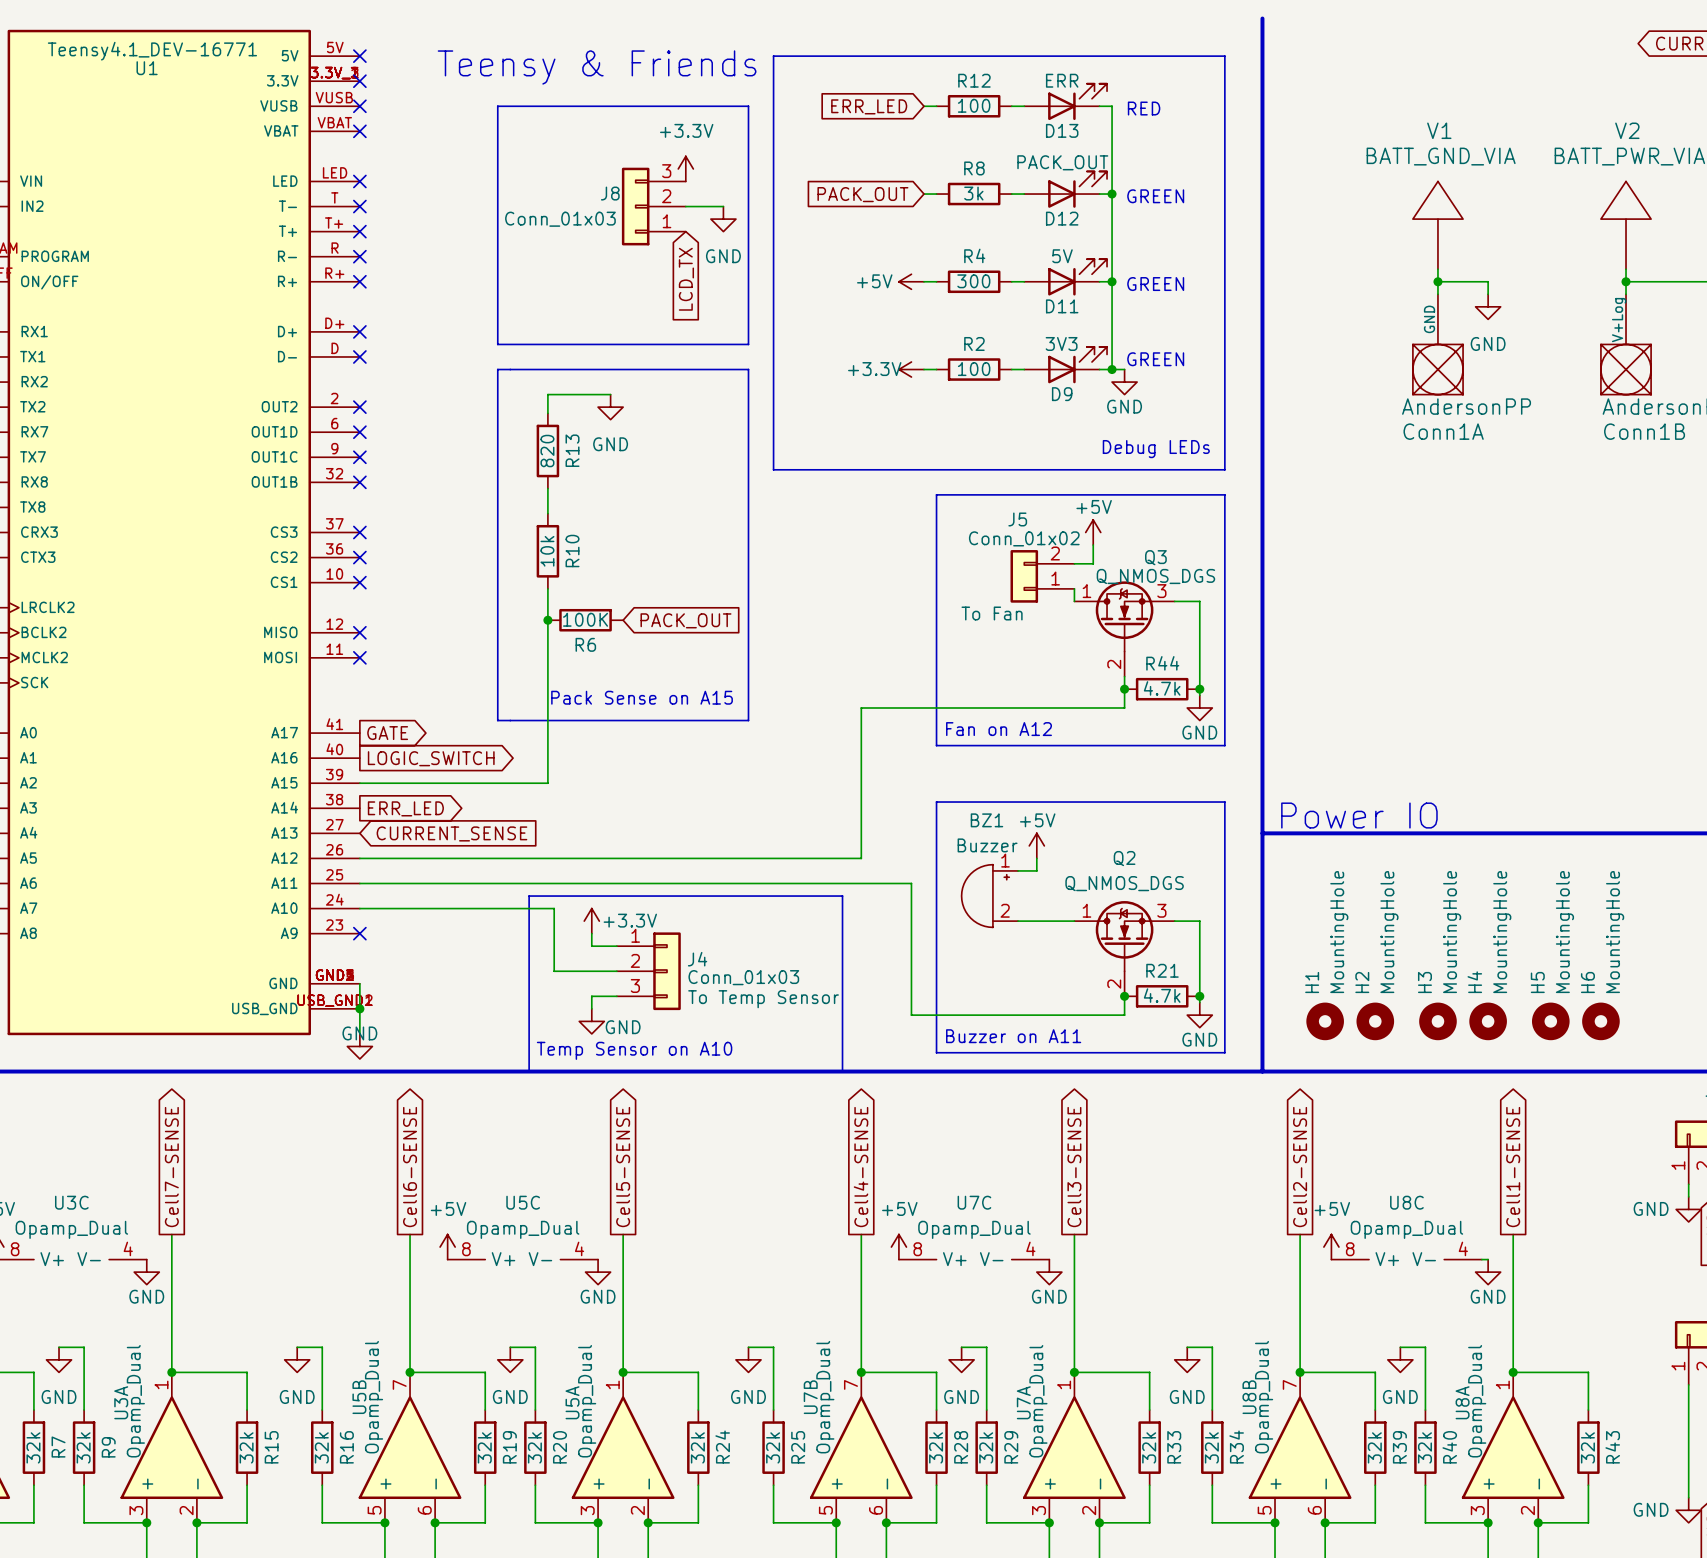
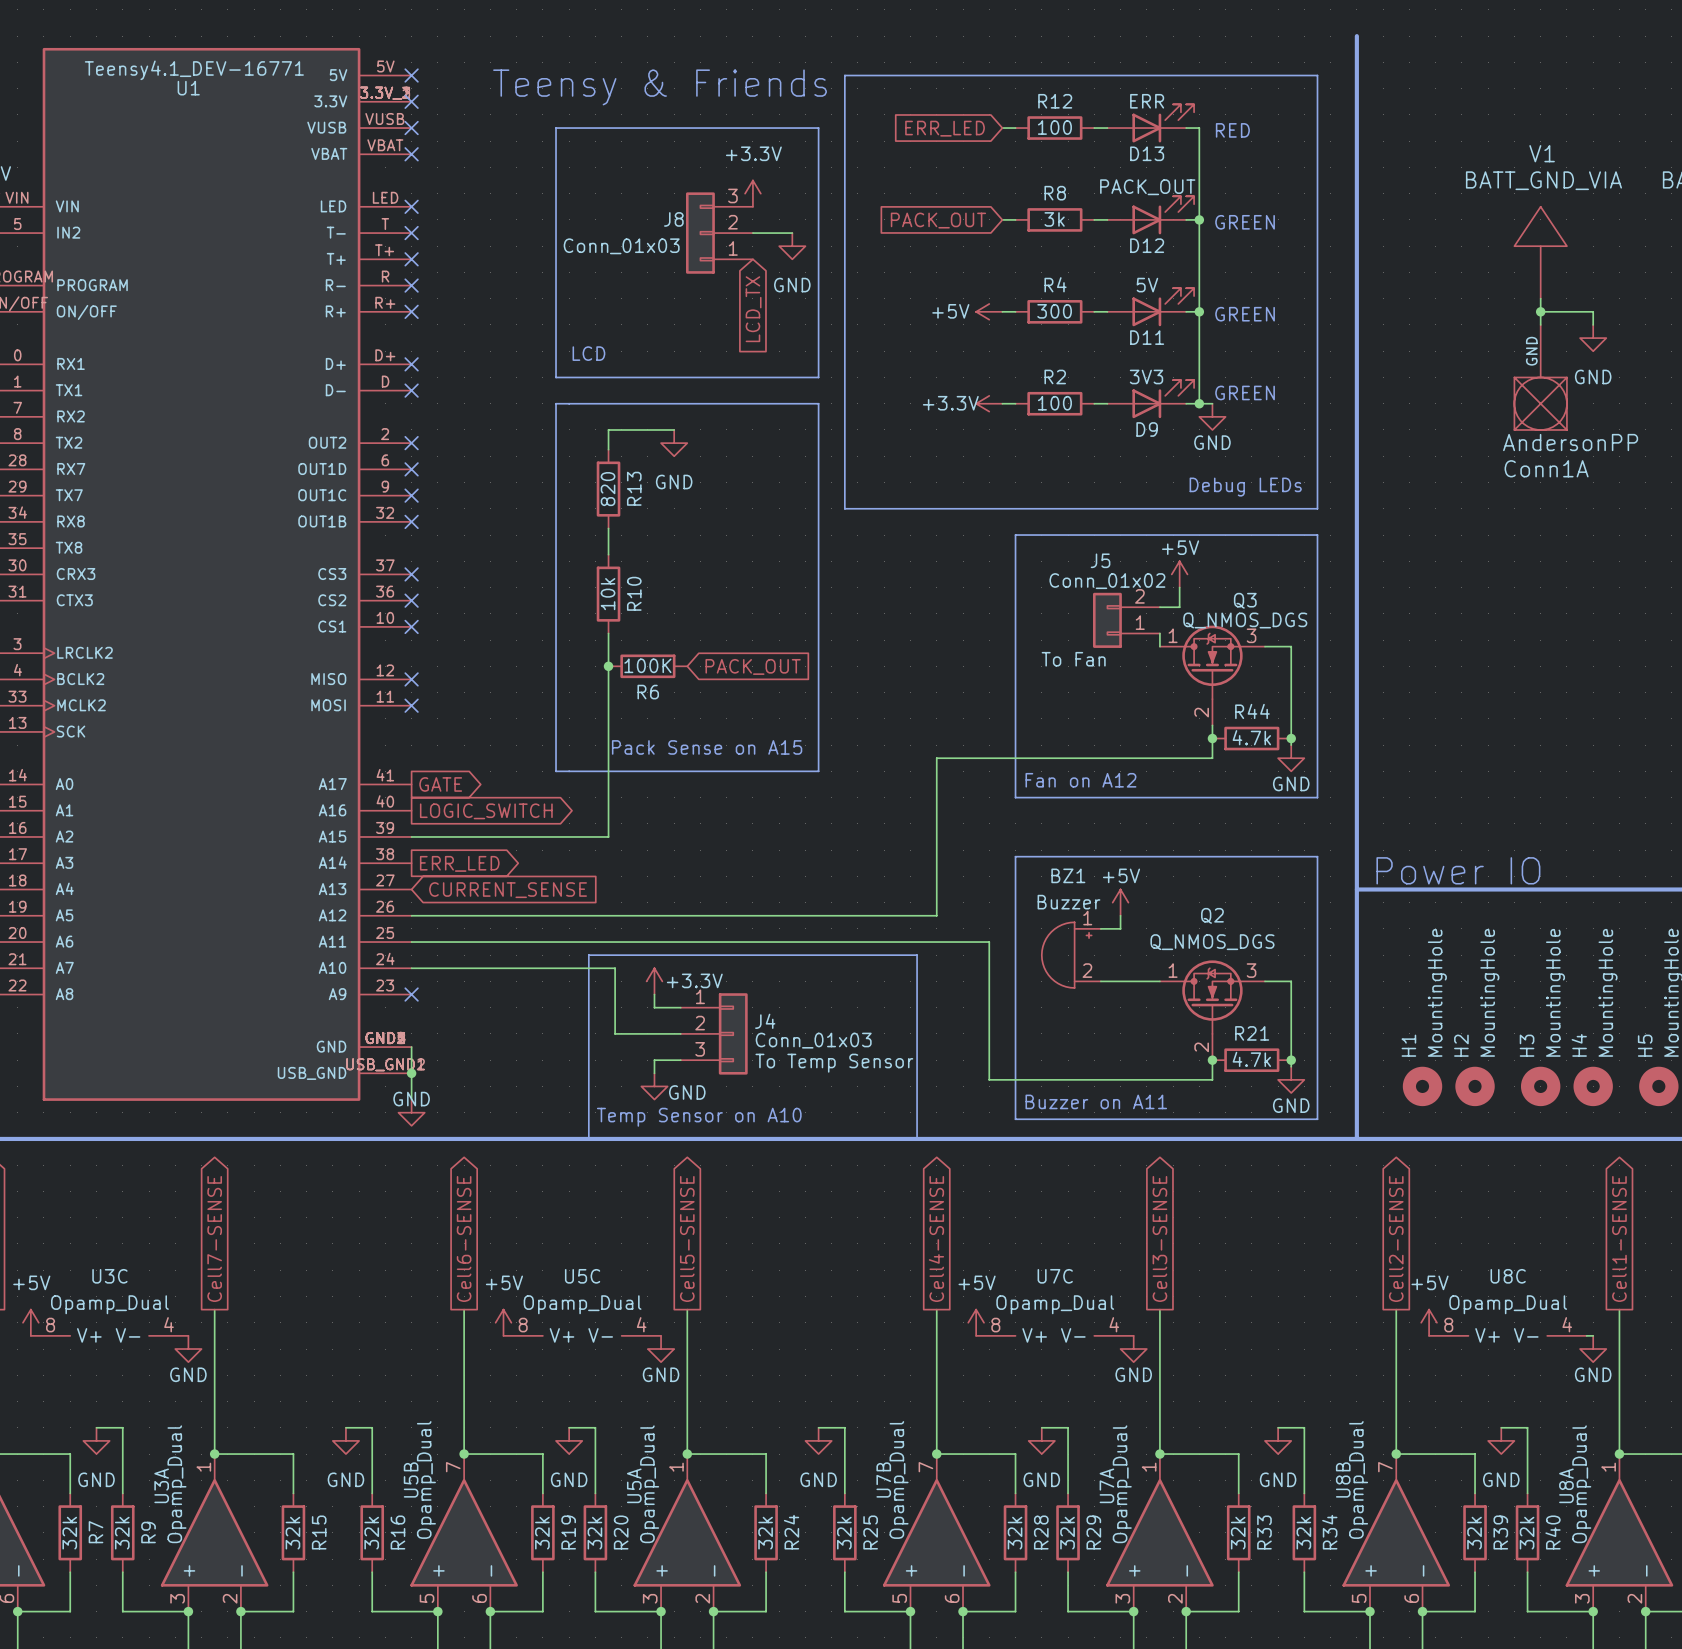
text: none -> LCD (588, 353)

